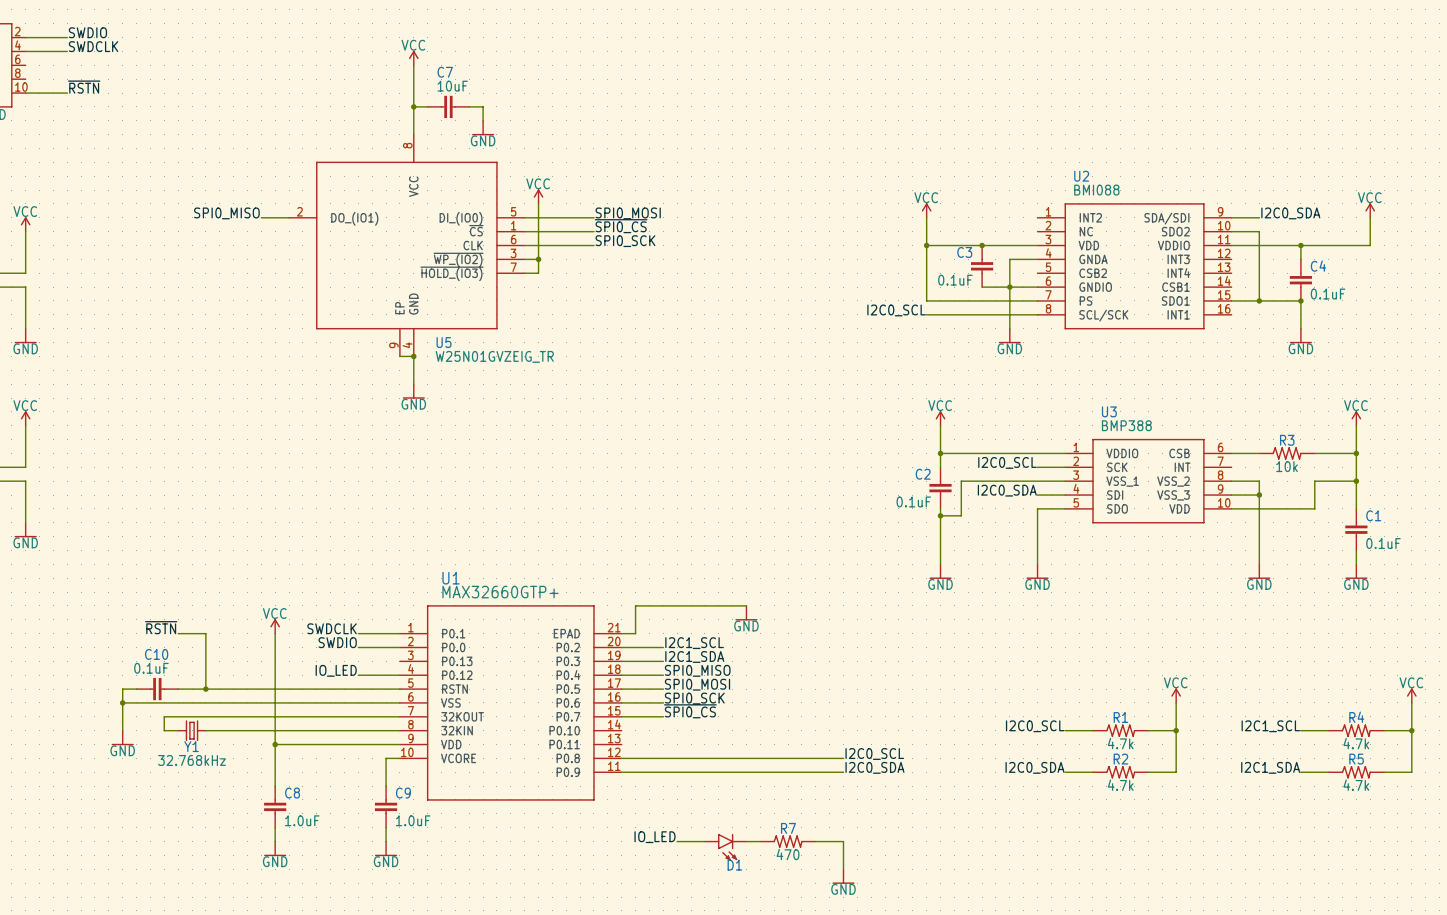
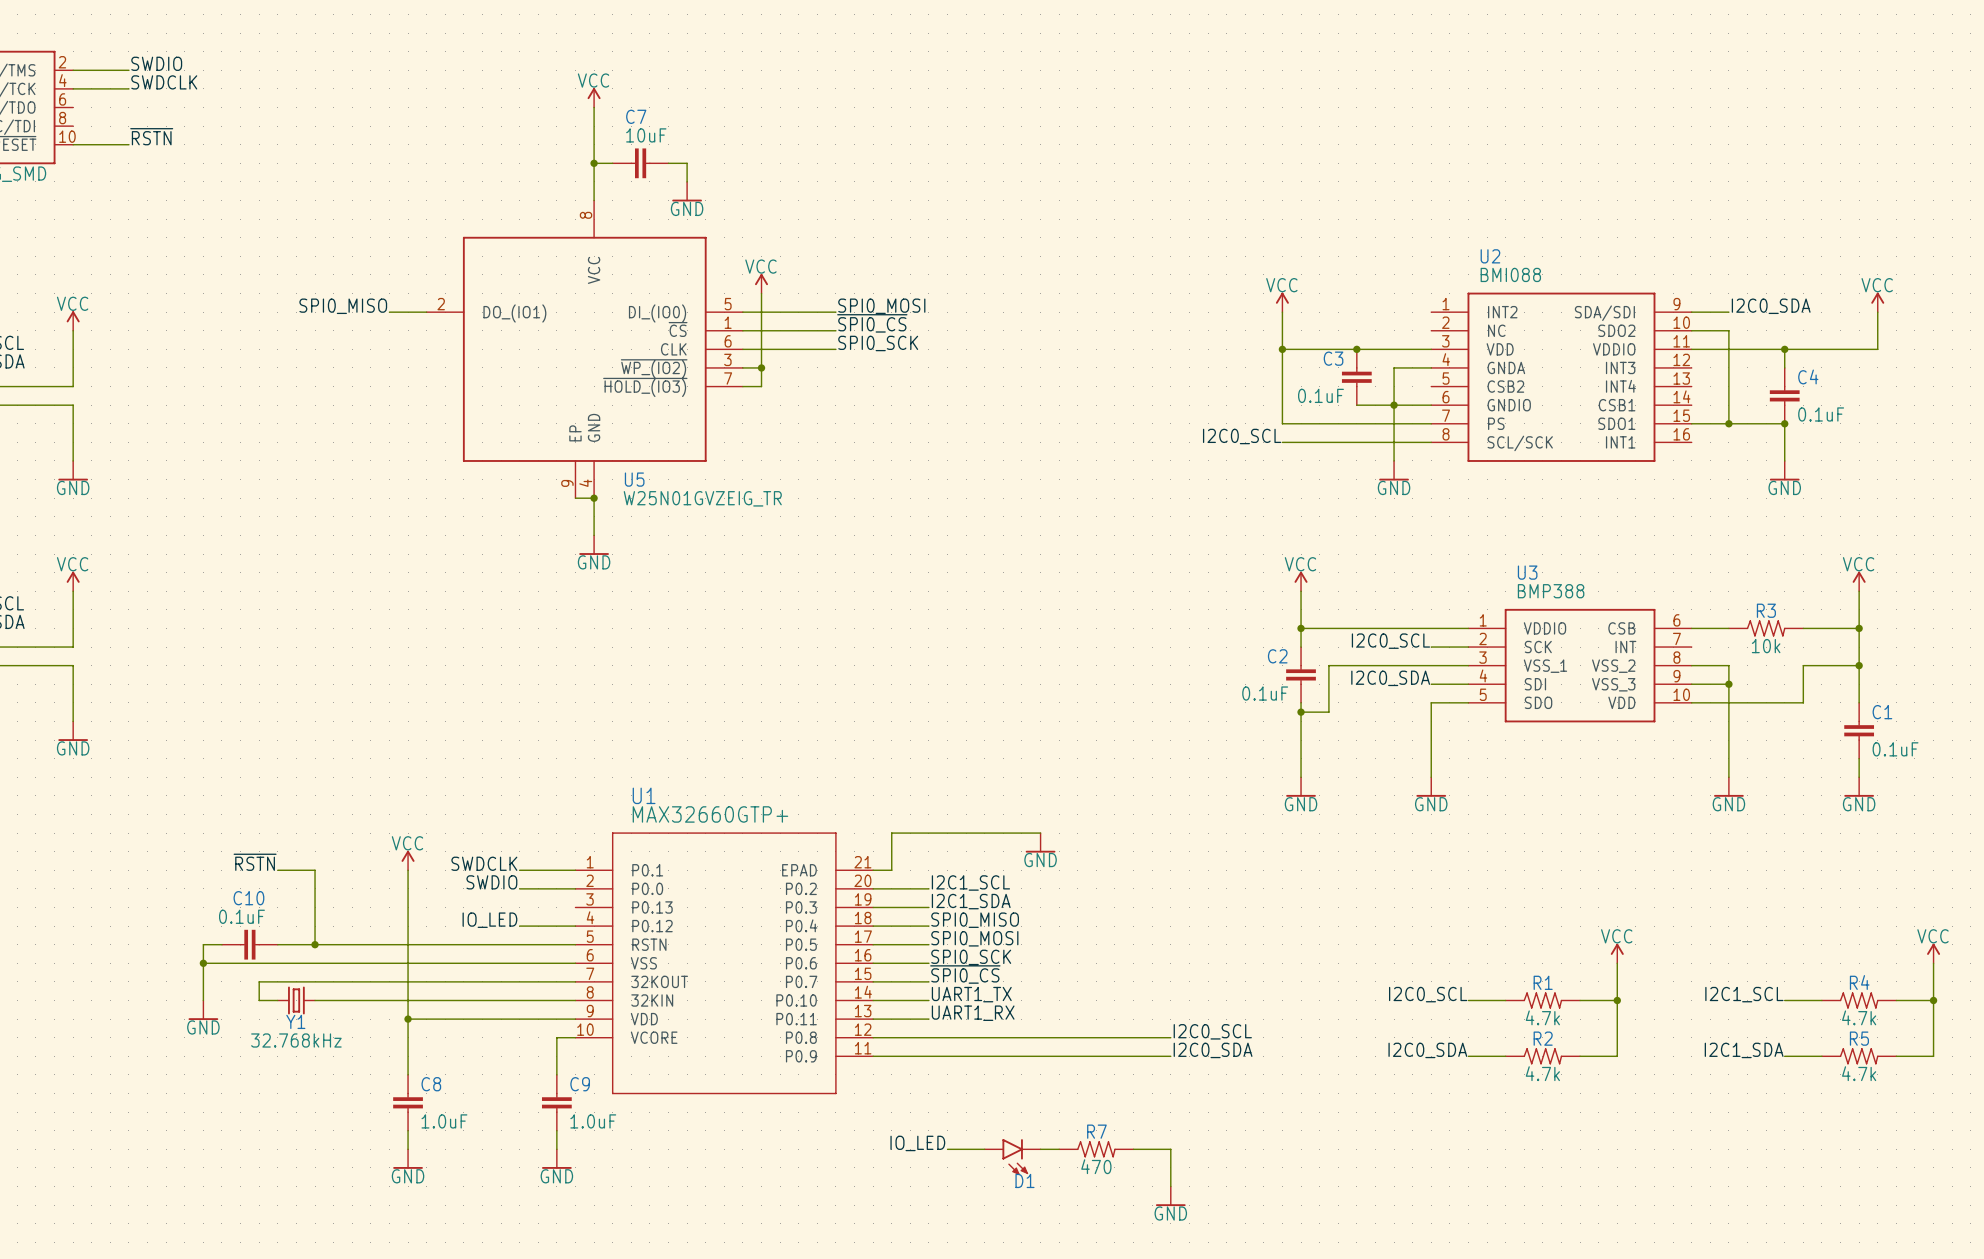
label: none -> UART1_TX (971, 994)
wire: none -> (873, 1000) (928, 1000)
label: none -> UART1_RX (973, 1013)
wire: none -> (873, 1019) (928, 1019)

